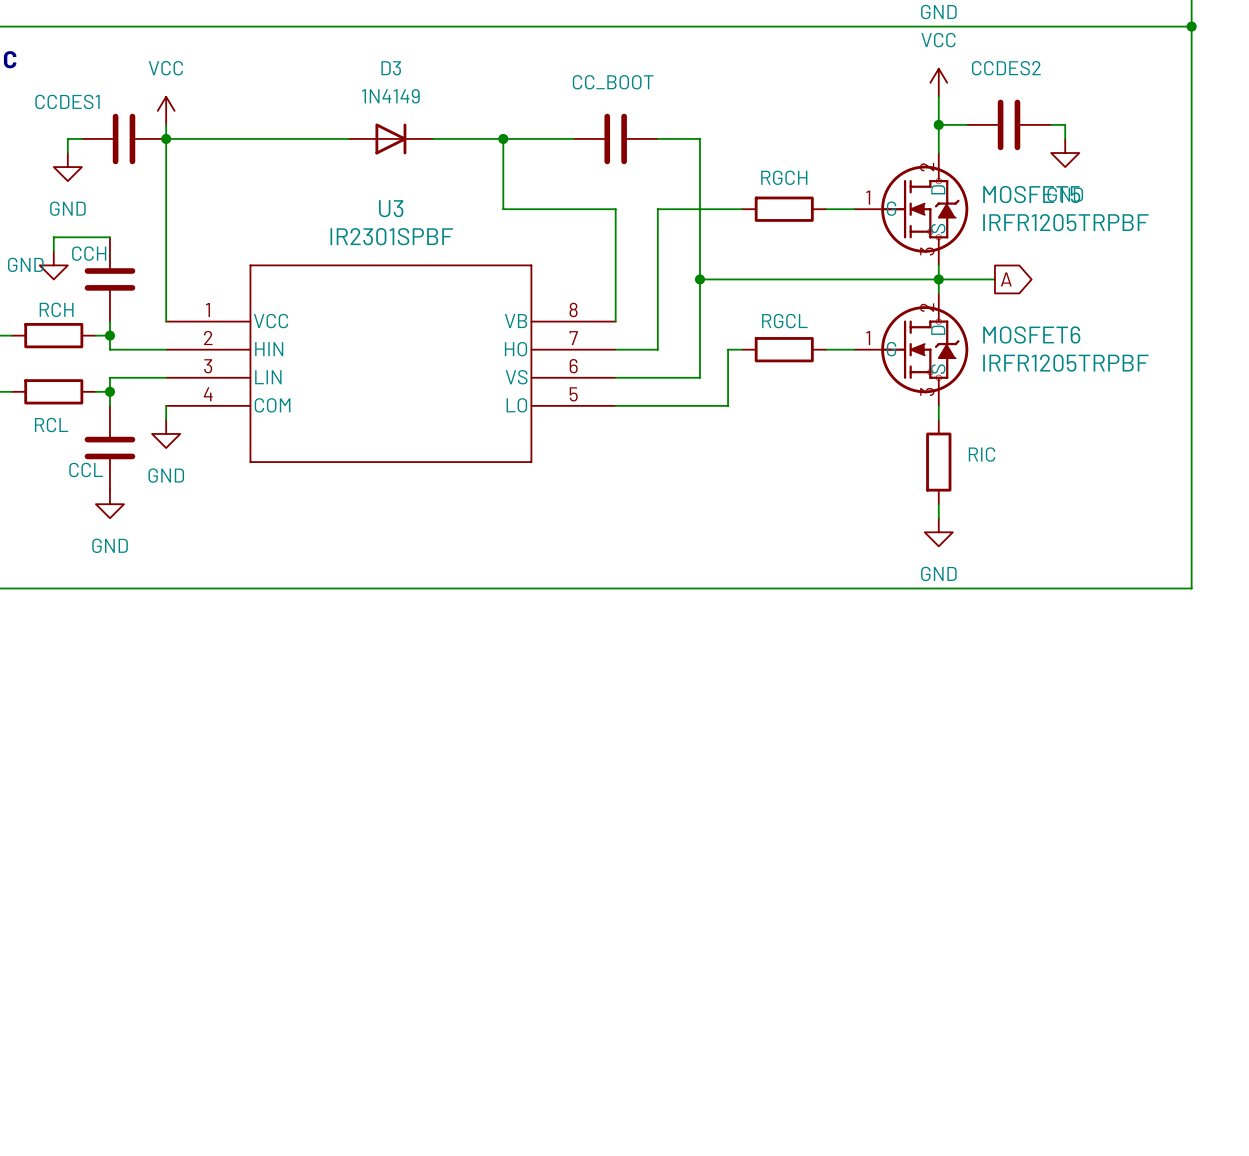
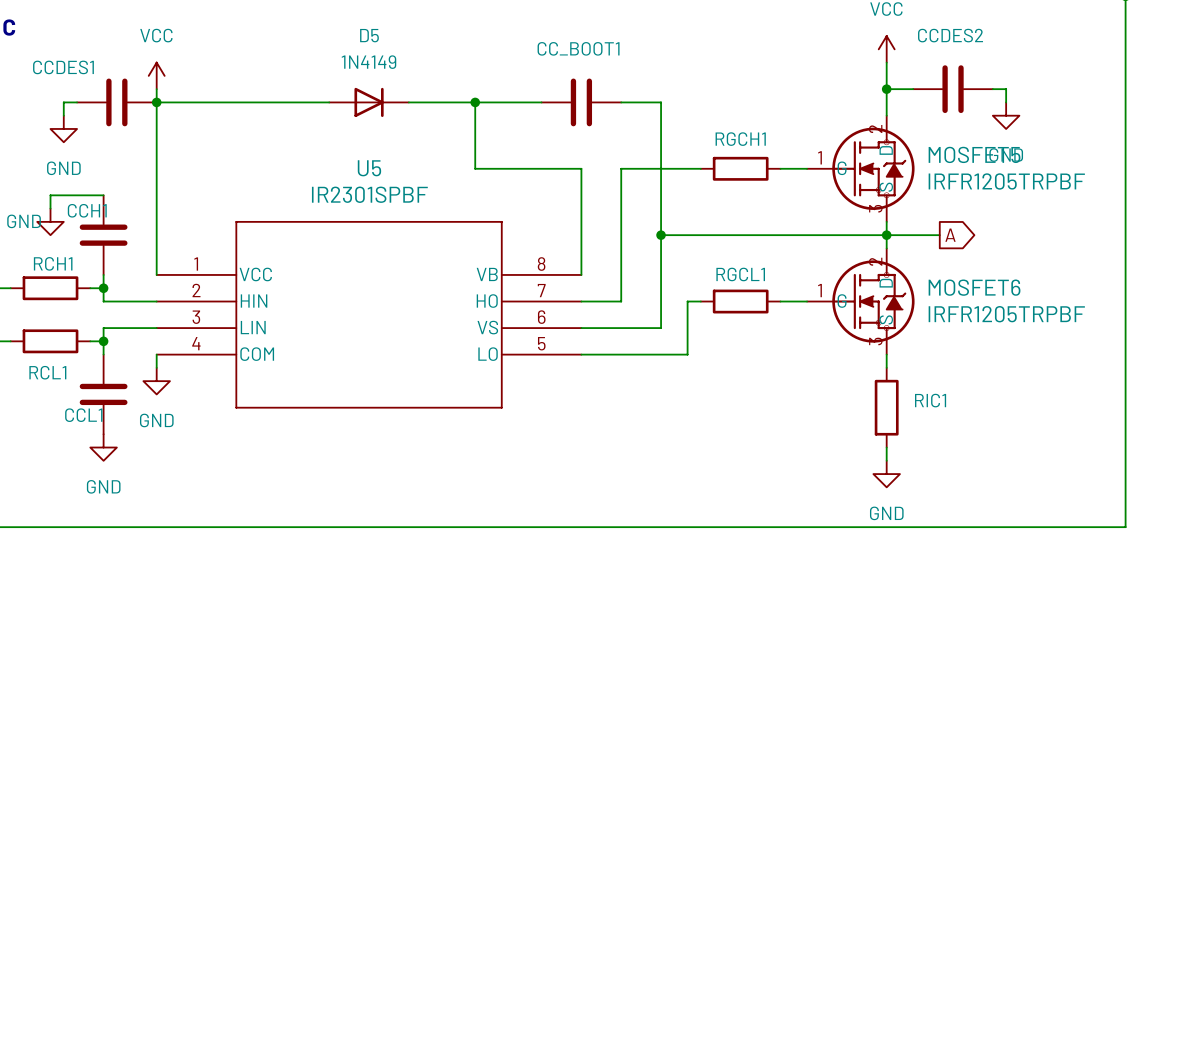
D3 name: D3 (391, 68) -> D5 (369, 35)
CC_BOOT name: CC_BOOT (613, 82) -> CC_BOOT1 (578, 48)
RGCH name: RGCH (784, 177) -> RGCH1 (740, 139)
U3 name: U3 (391, 208) -> U5 (369, 168)
CCH name: CCH (89, 253) -> CCH1 (87, 210)
RCH name: RCH (56, 309) -> RCH1 (53, 263)
RGCL name: RGCL (784, 321) -> RGCL1 (740, 274)
RCL name: RCL (51, 425) -> RCL1 (47, 372)
RIC name: RIC (982, 454) -> RIC1 (930, 400)
CCL name: CCL (86, 469) -> CCL1 (83, 415)

